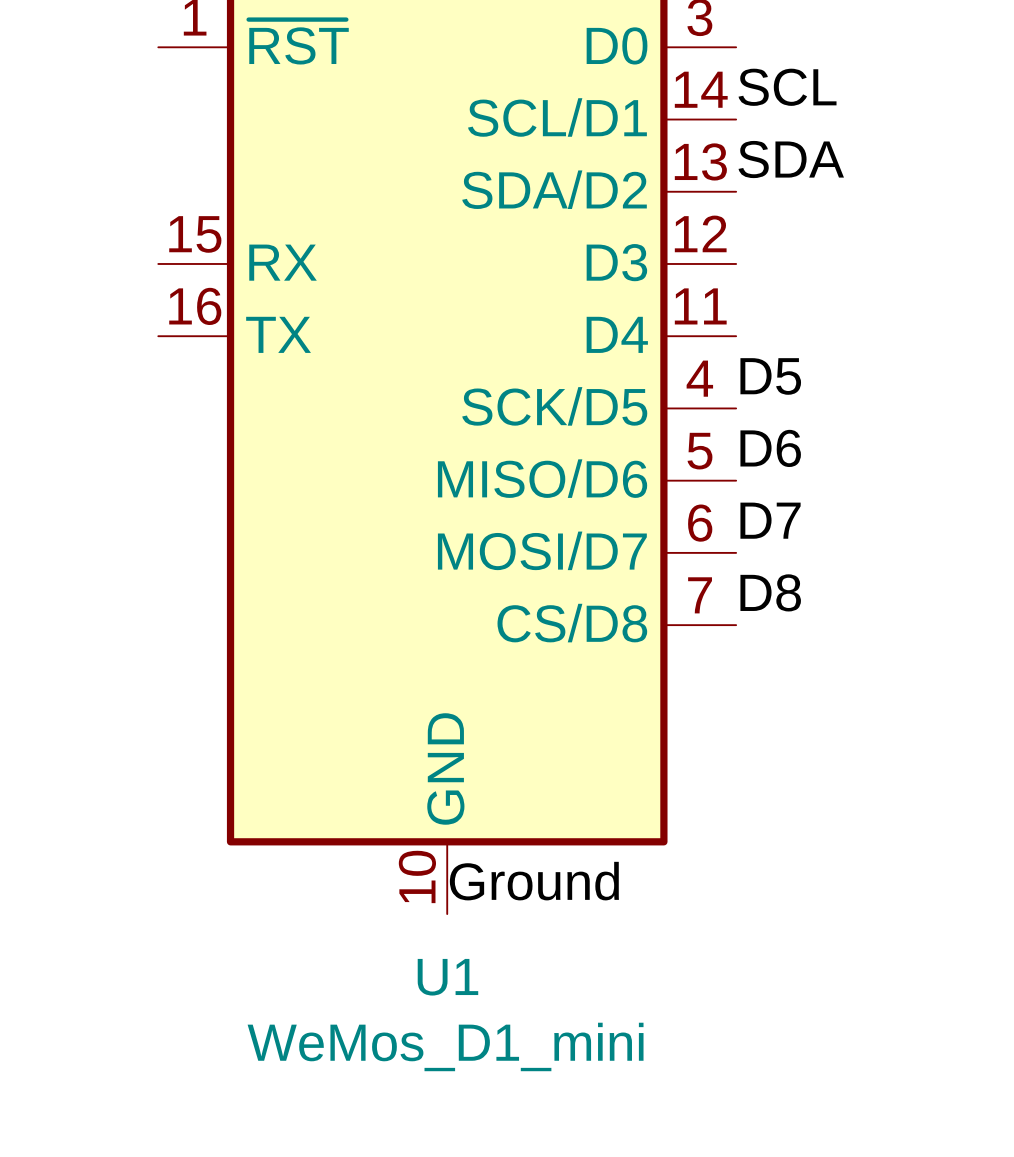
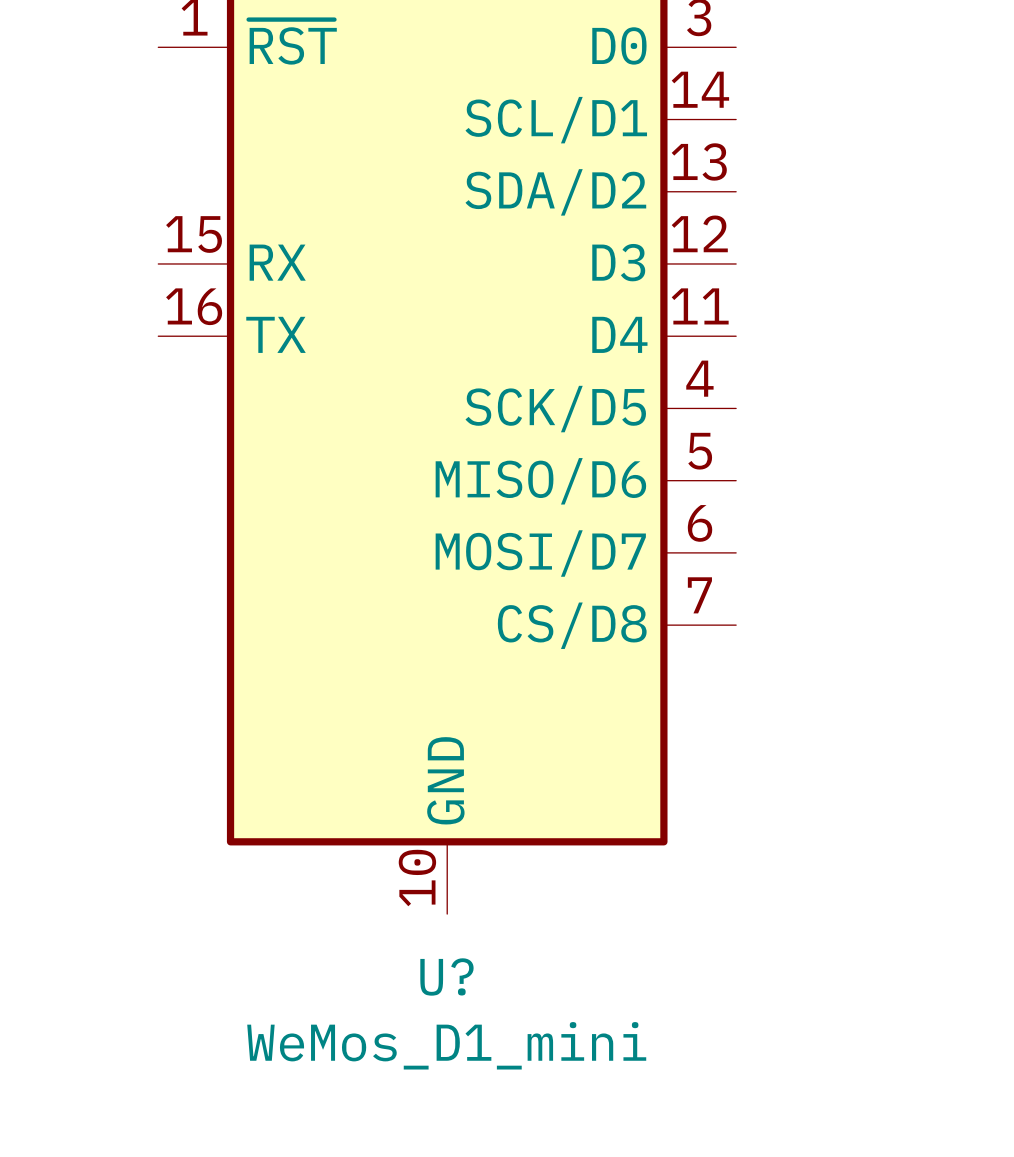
label: SCL (787, 87) -> none
label: SDA (791, 159) -> none
label: D5 (770, 376) -> none
label: D6 (770, 448) -> none
label: D7 (770, 520) -> none
label: D8 (770, 592) -> none
label: Ground (534, 881) -> none
U1 name: U1 (447, 977) -> U? (446, 976)

